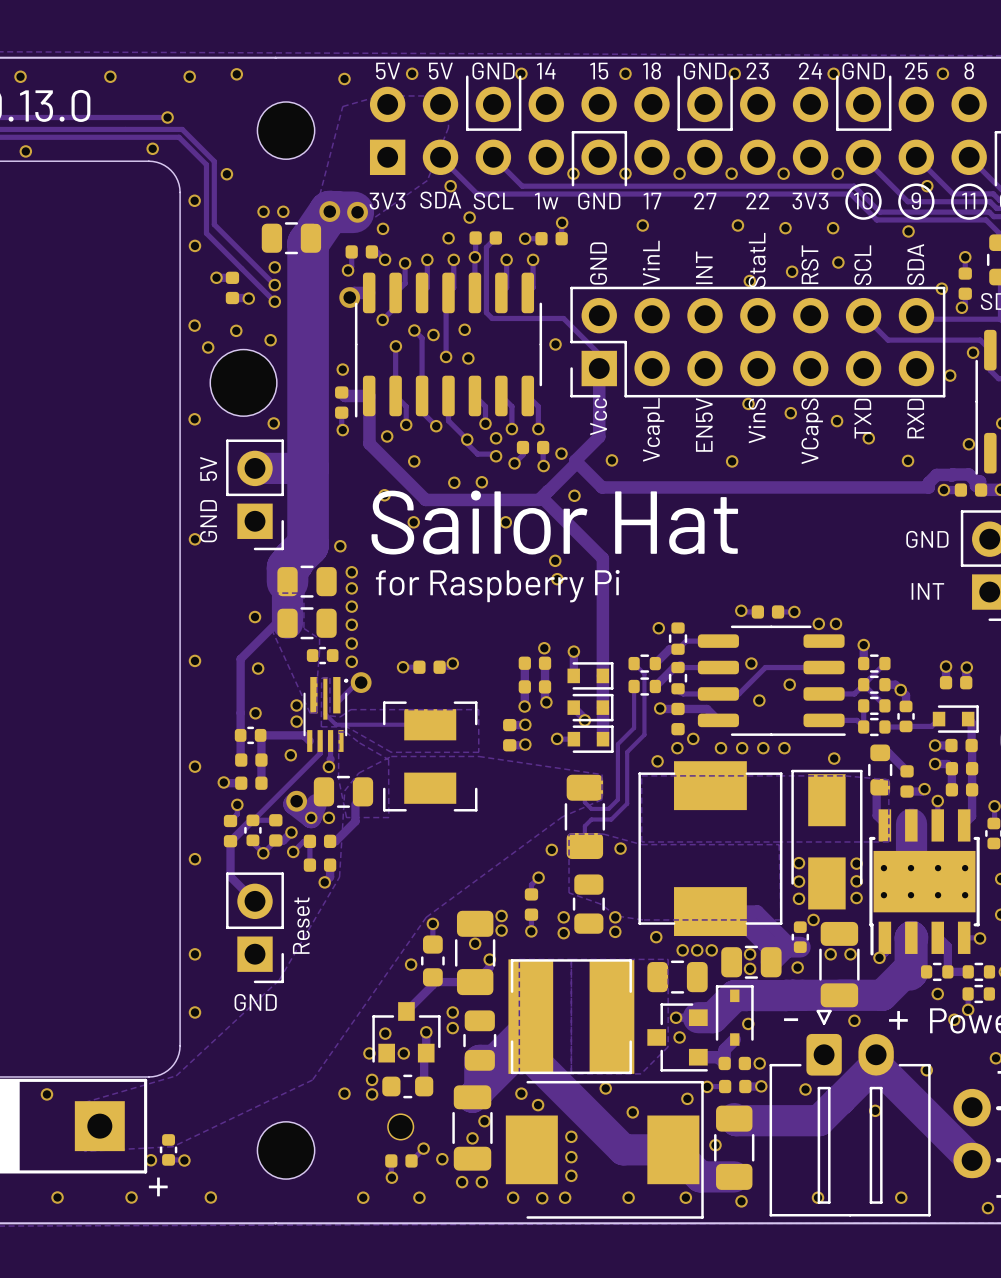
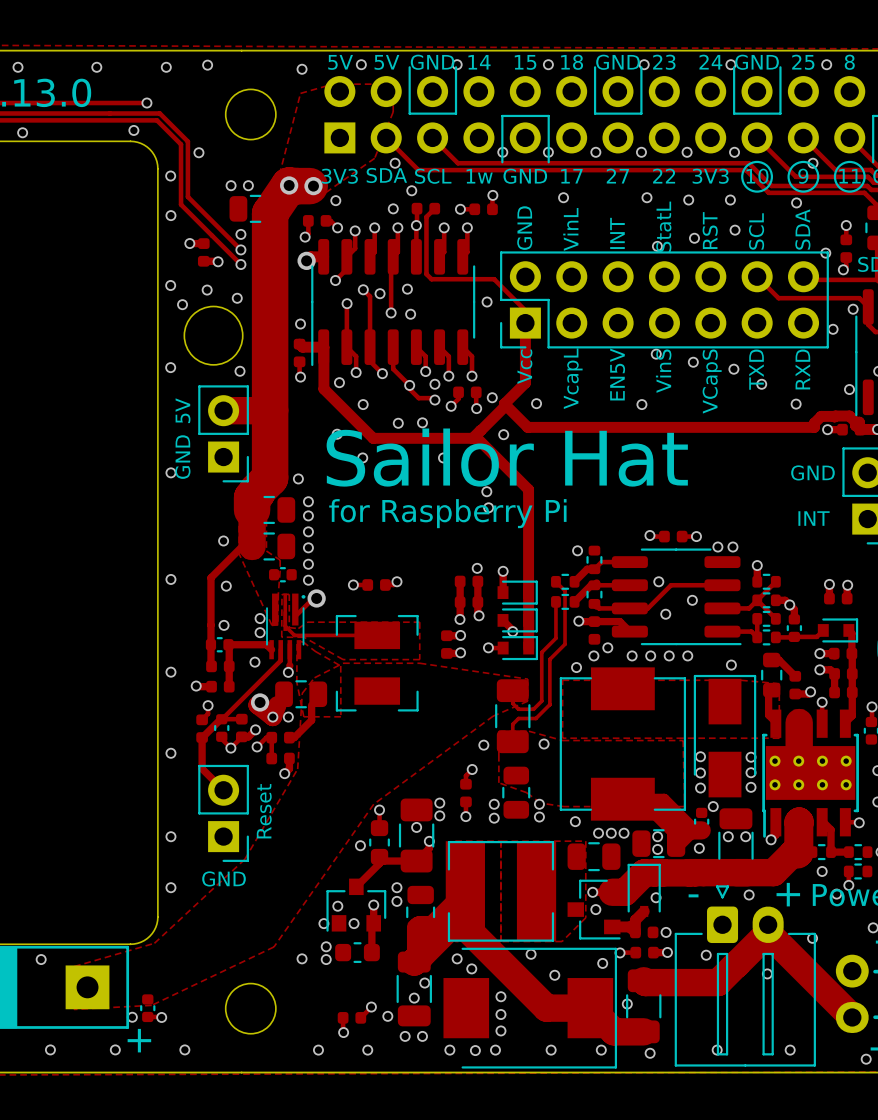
part: (400, 1126) -> none

